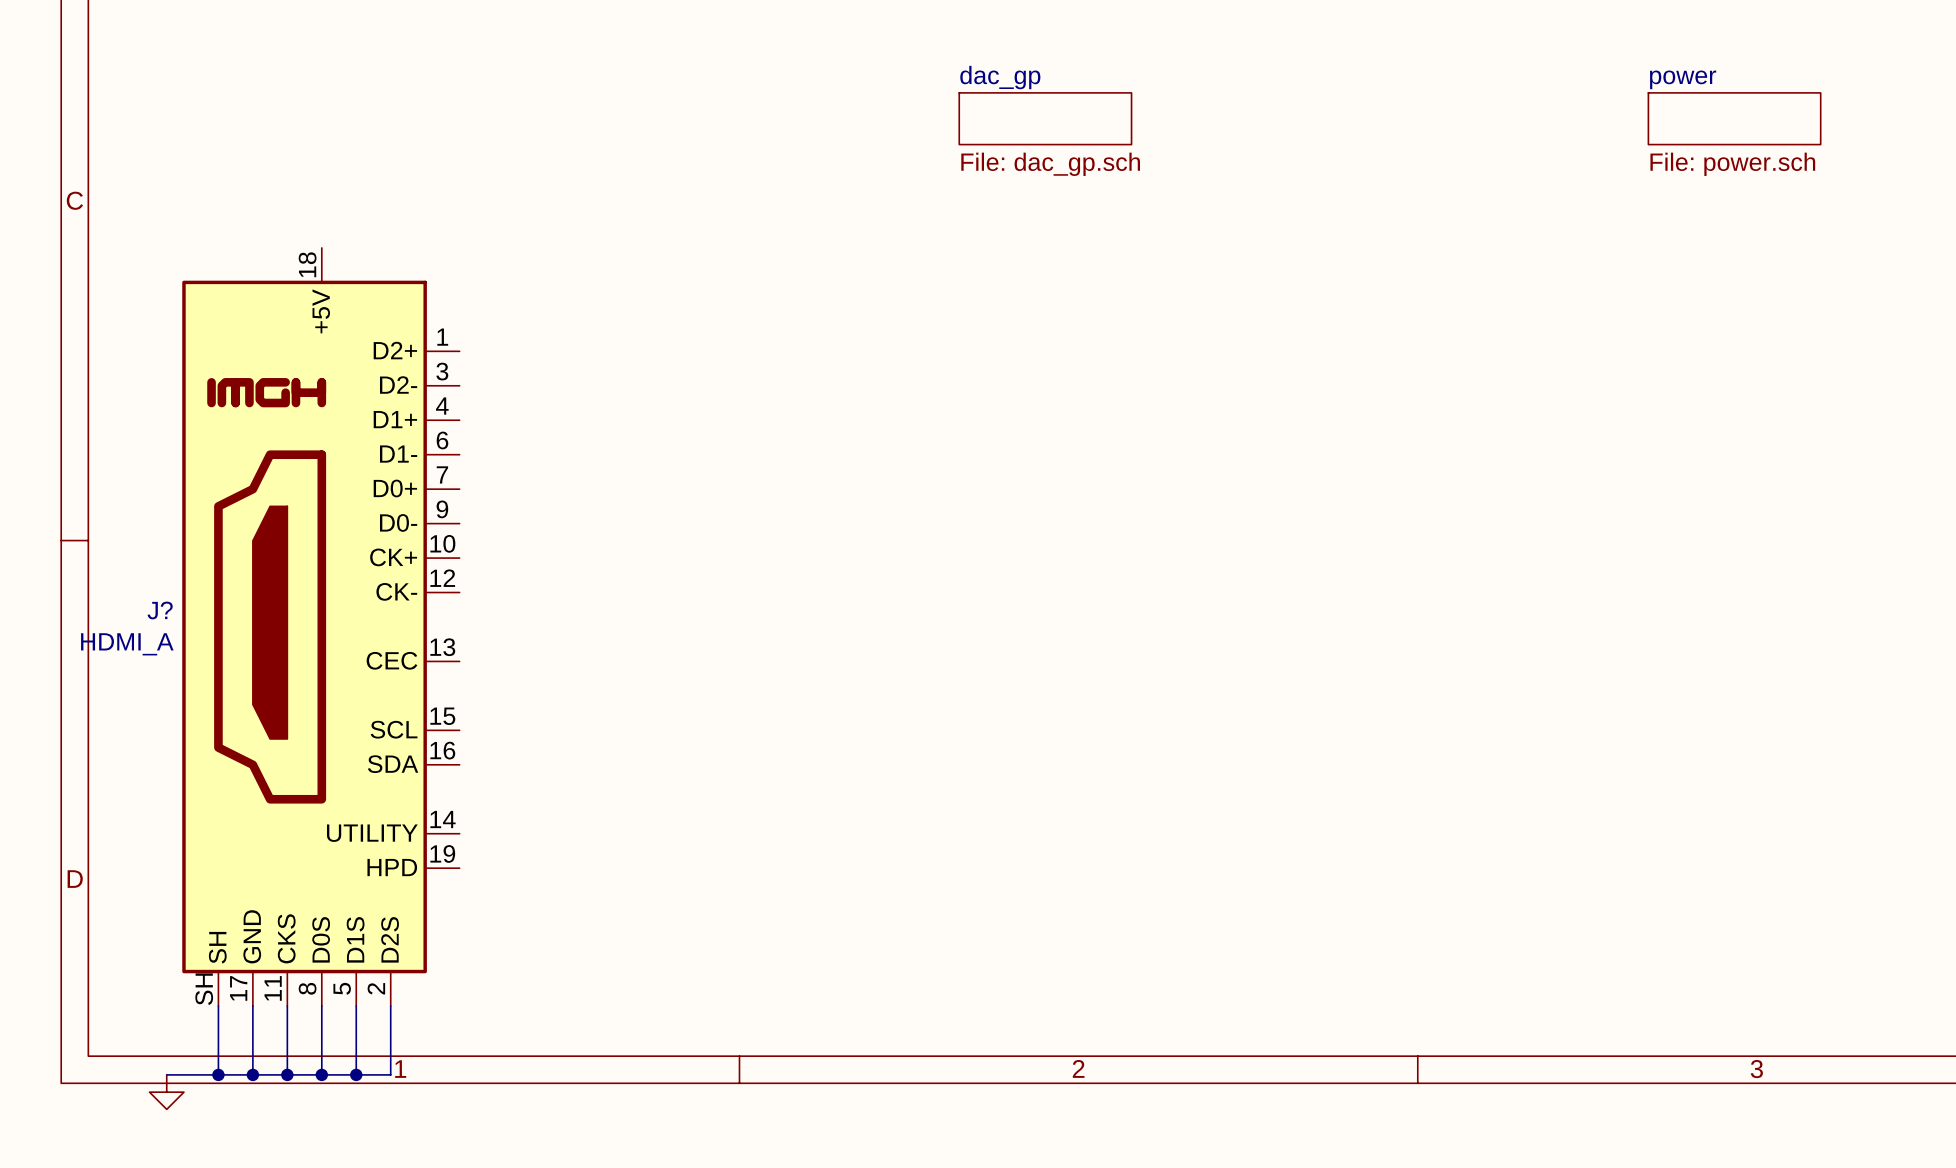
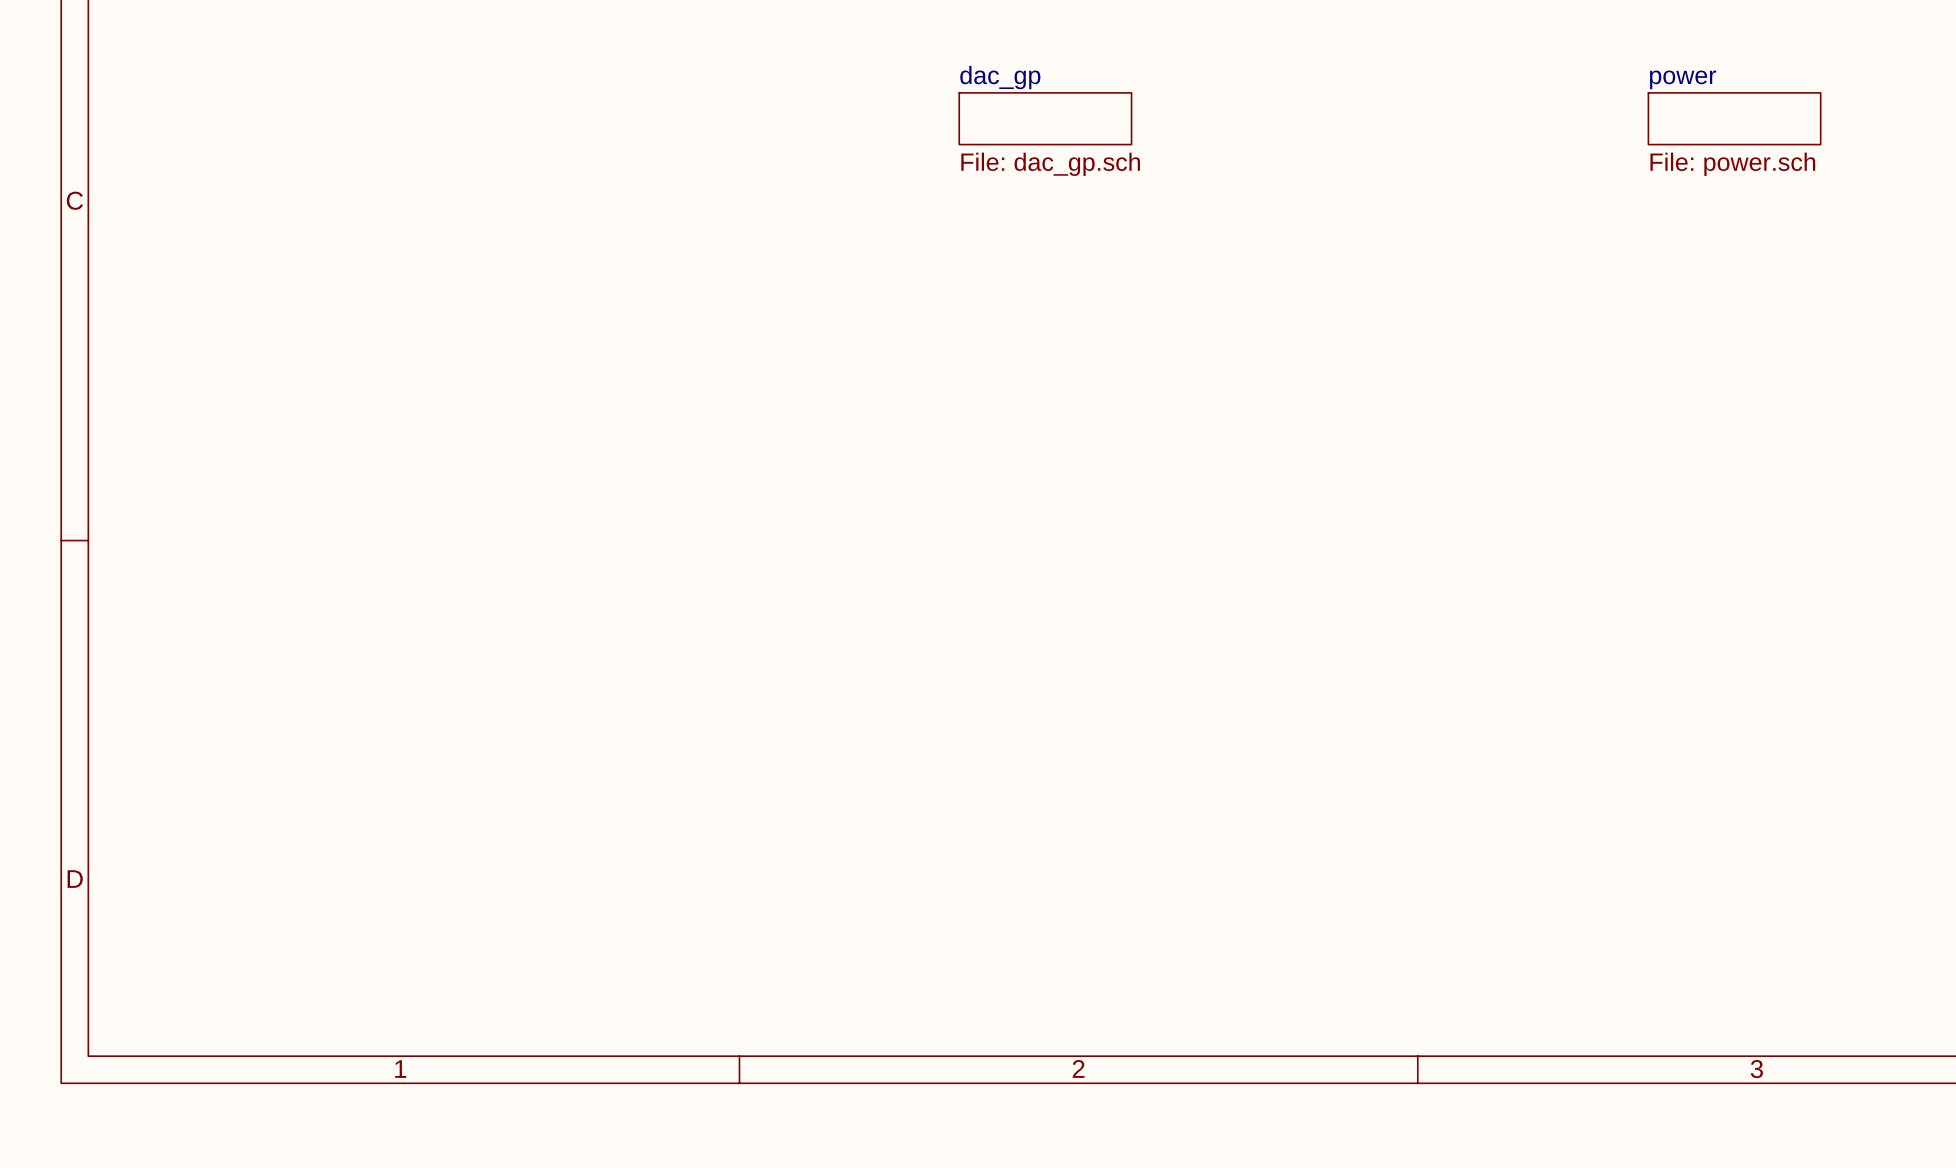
J?: HDMI_A (320, 626) -> none
wire: (218, 1006) (218, 1074) -> none
wire: (252, 1006) (252, 1074) -> none
wire: (287, 1006) (287, 1074) -> none
wire: (321, 1006) (321, 1074) -> none
wire: (356, 1006) (356, 1074) -> none
wire: (390, 1006) (390, 1074) (166, 1074) -> none
junction: (218, 1074) -> none
junction: (252, 1074) -> none
junction: (287, 1074) -> none
junction: (321, 1074) -> none
junction: (356, 1074) -> none
power symbol: (166, 1092) -> none

